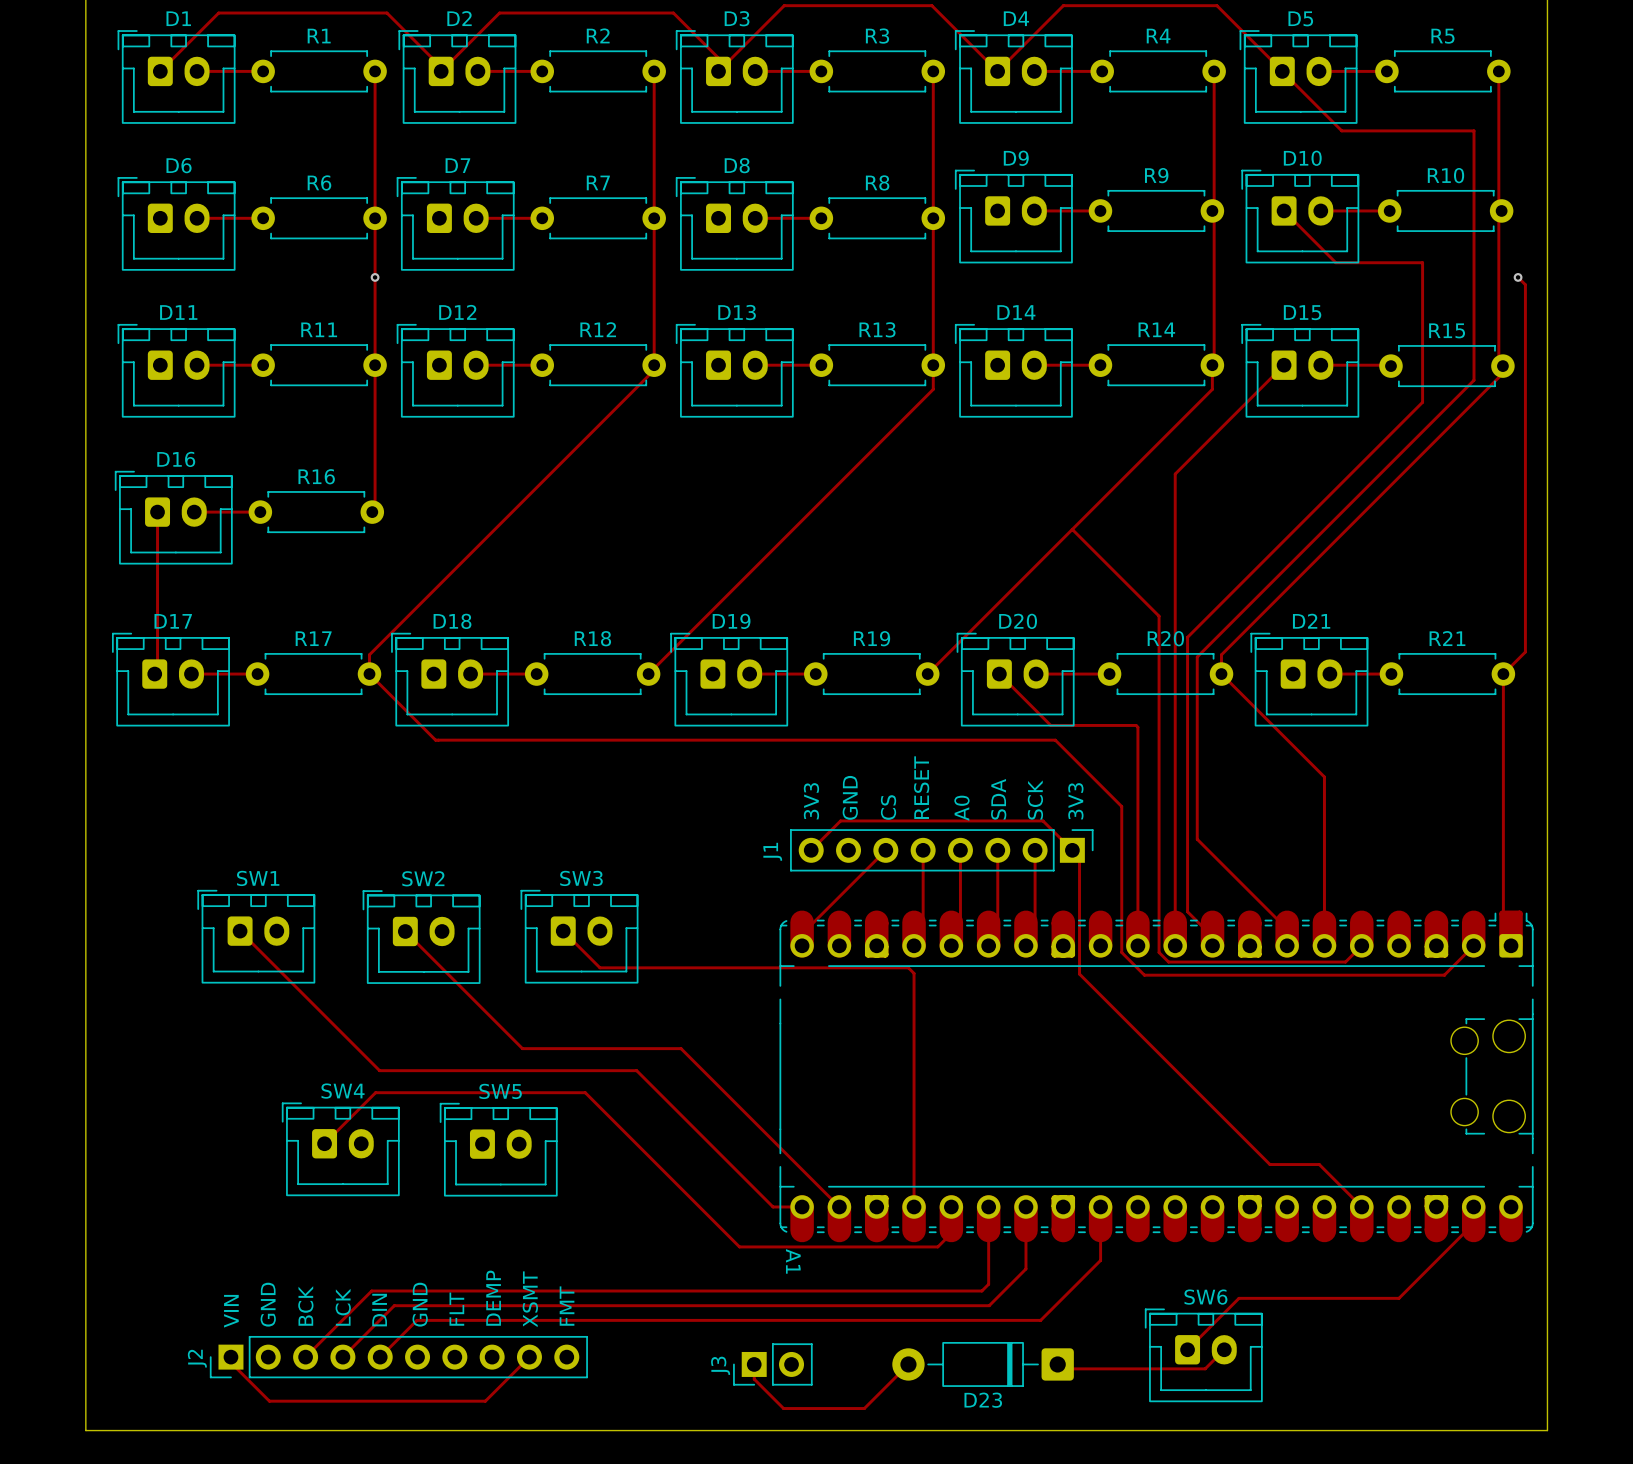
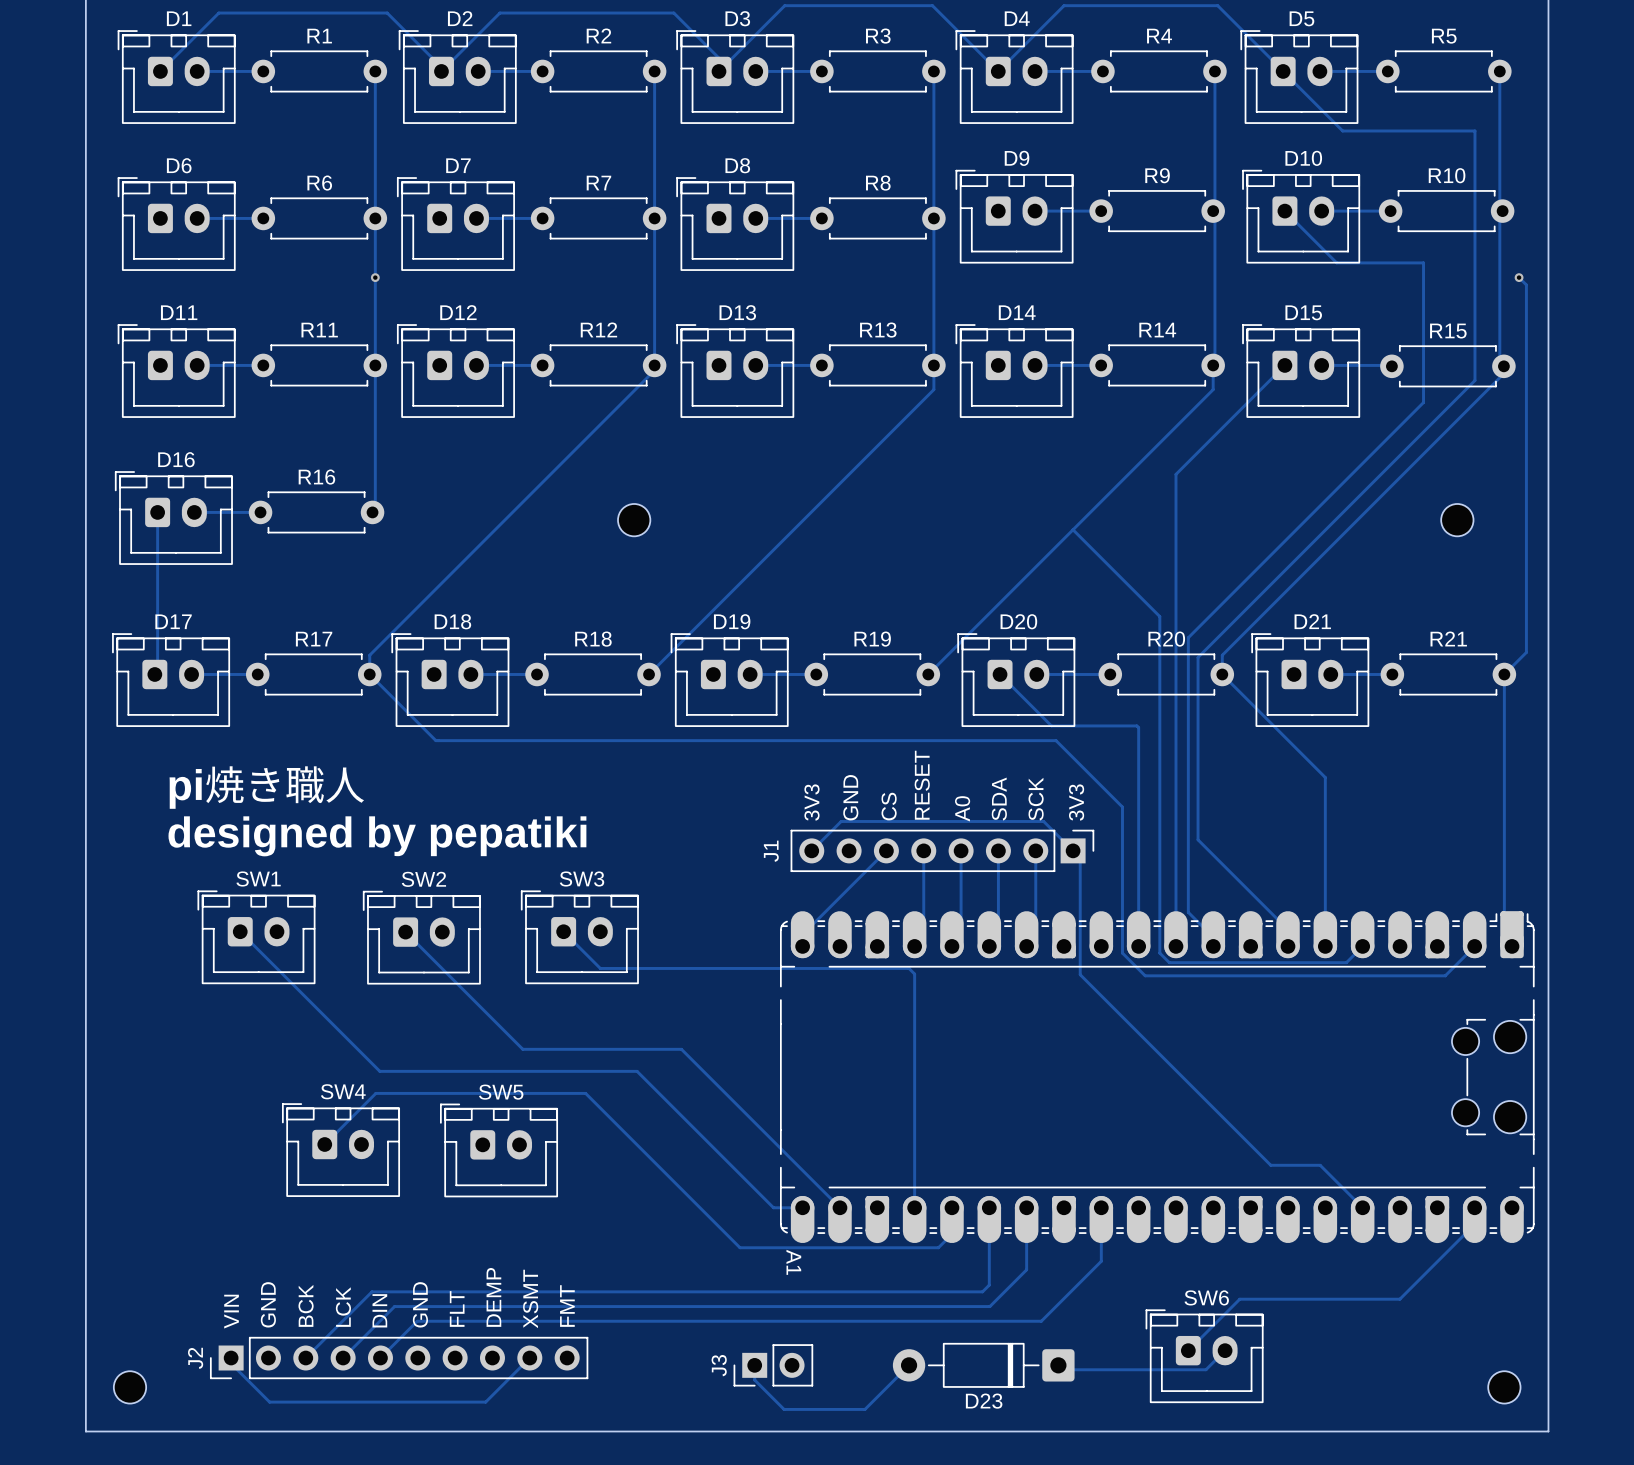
part: none -> (634, 520)
part: none -> (1457, 520)
text: none -> pi焼き職人 (266, 787)
text: none -> designed by pepatiki (377, 836)
part: none -> (129, 1387)
part: none -> (1504, 1387)

